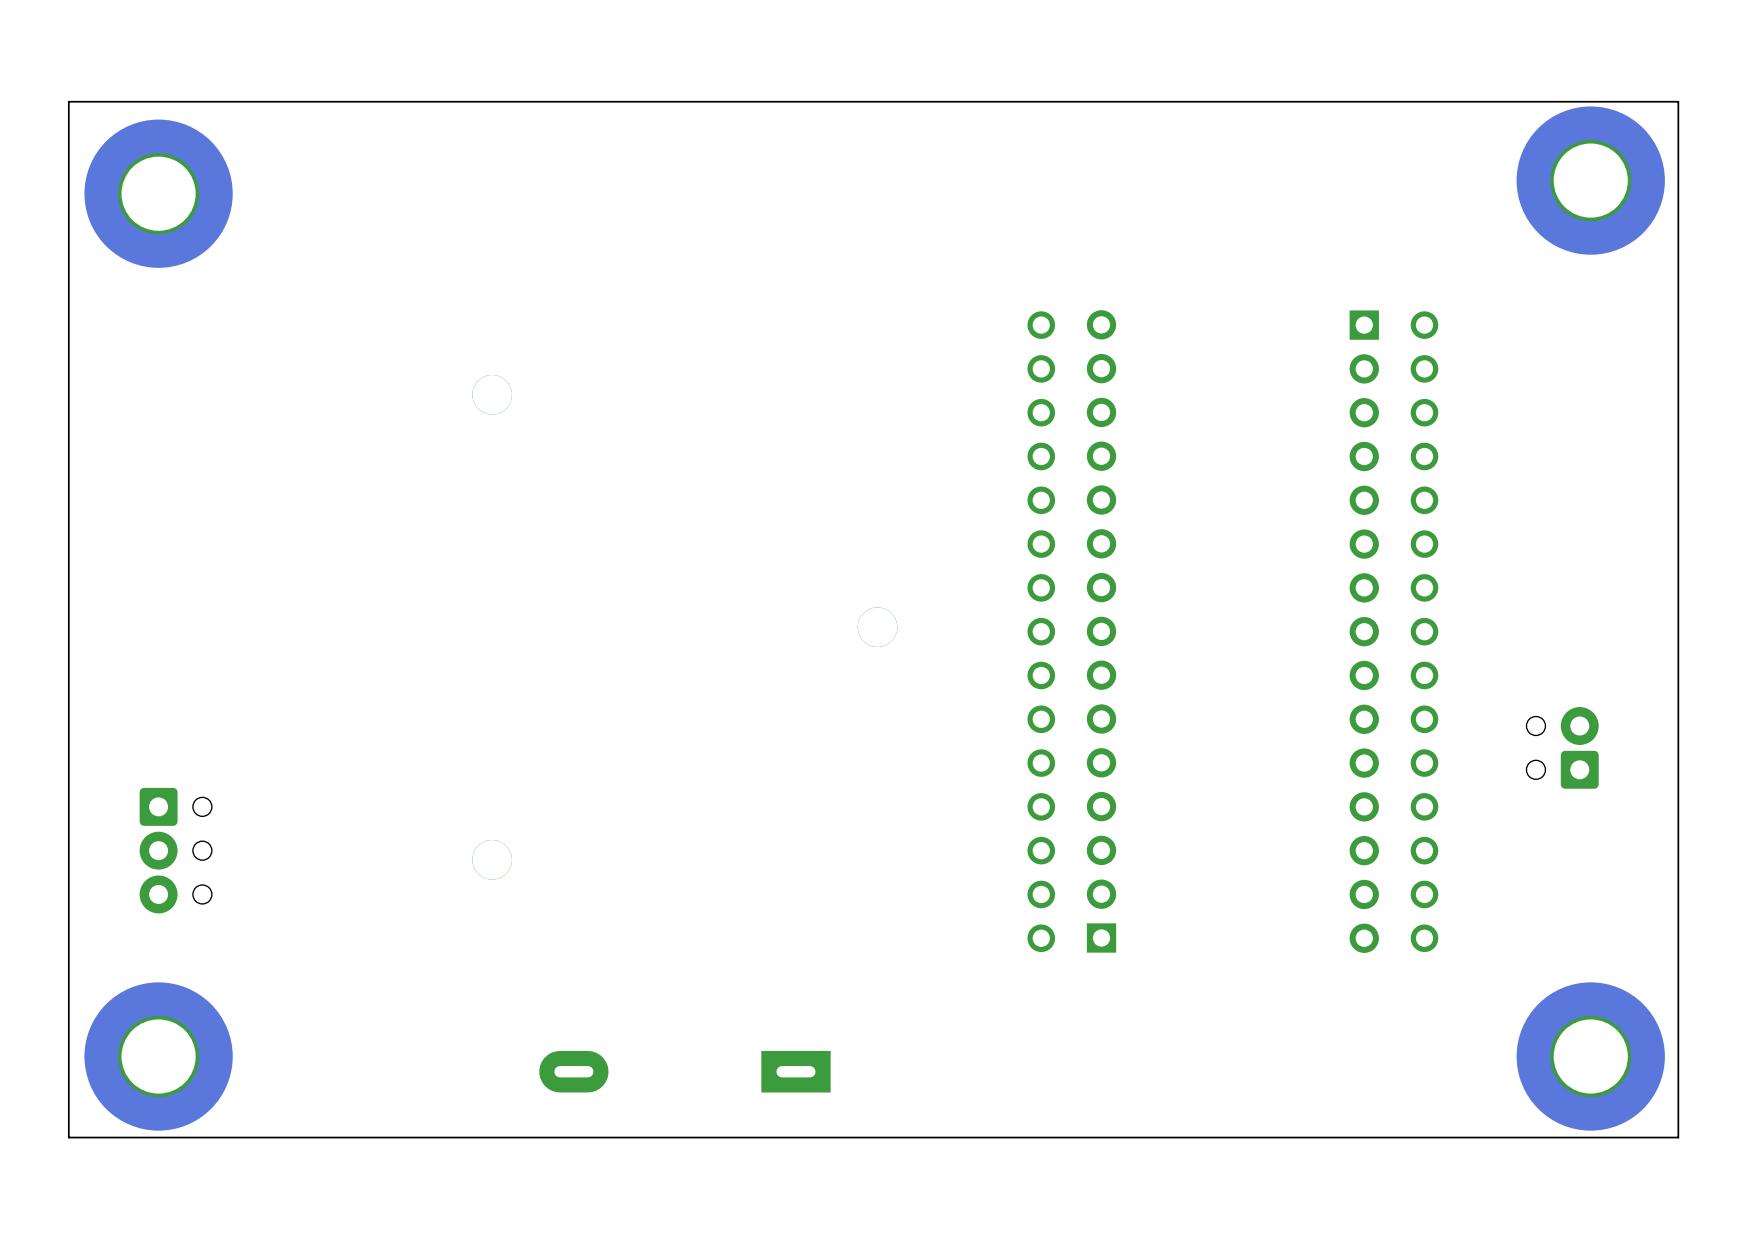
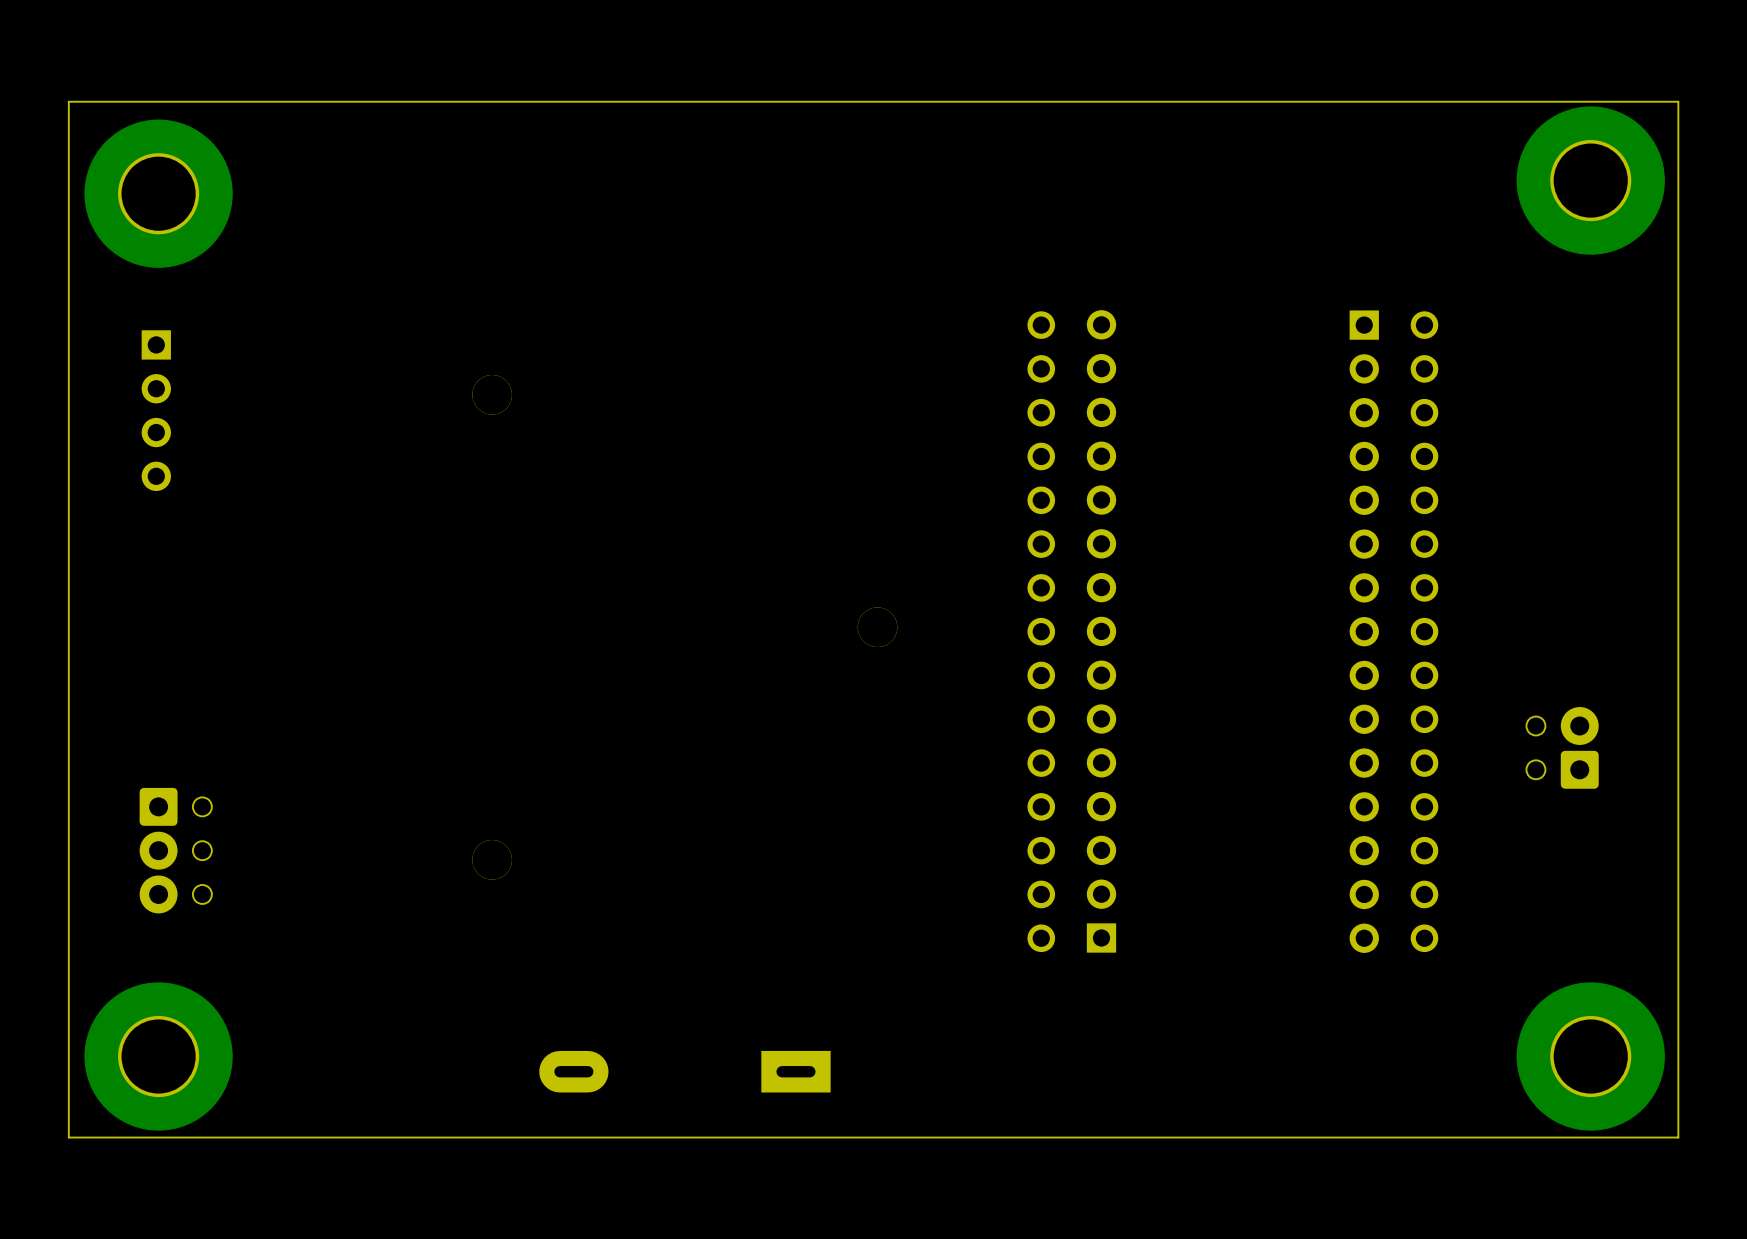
part: none -> (156, 410)

